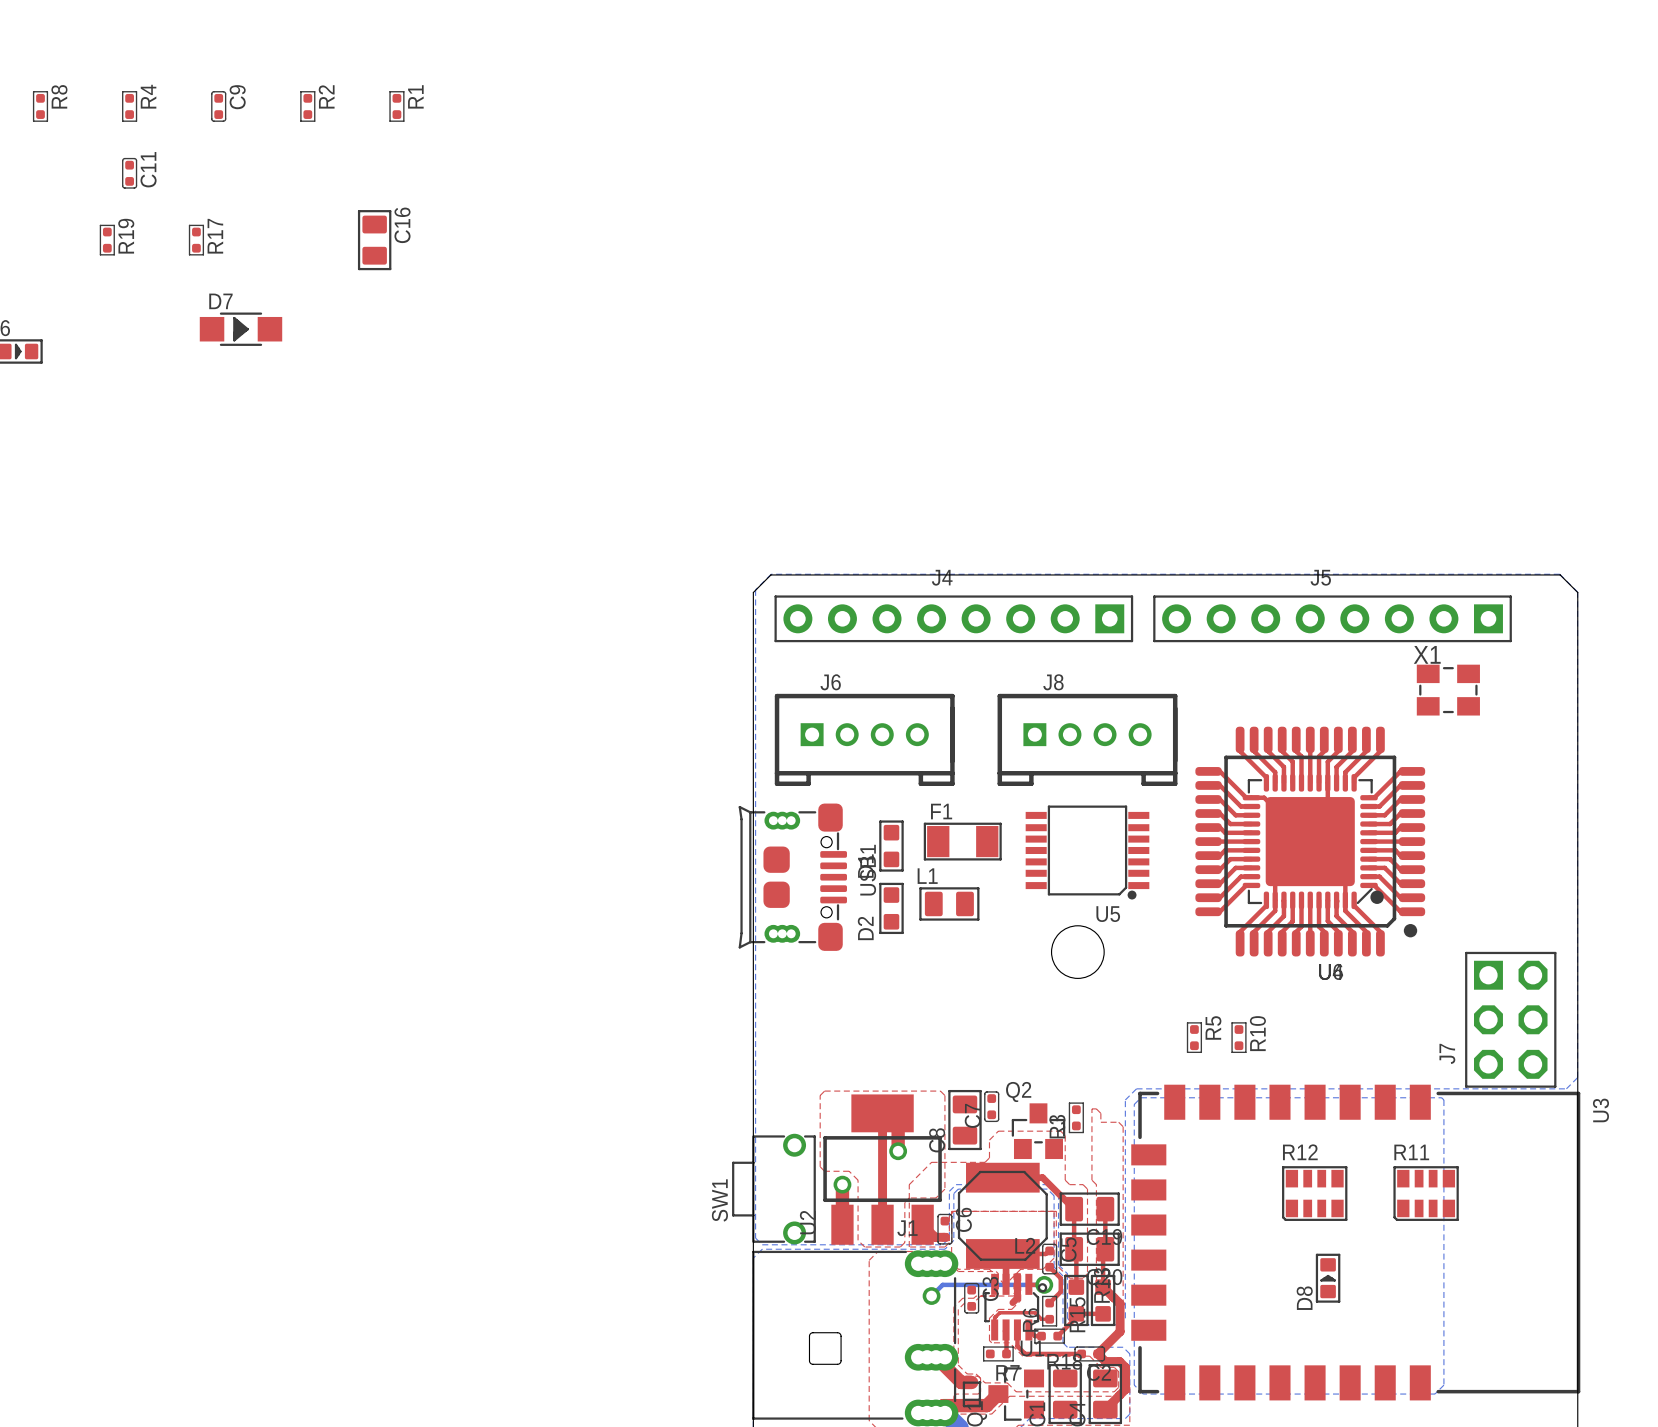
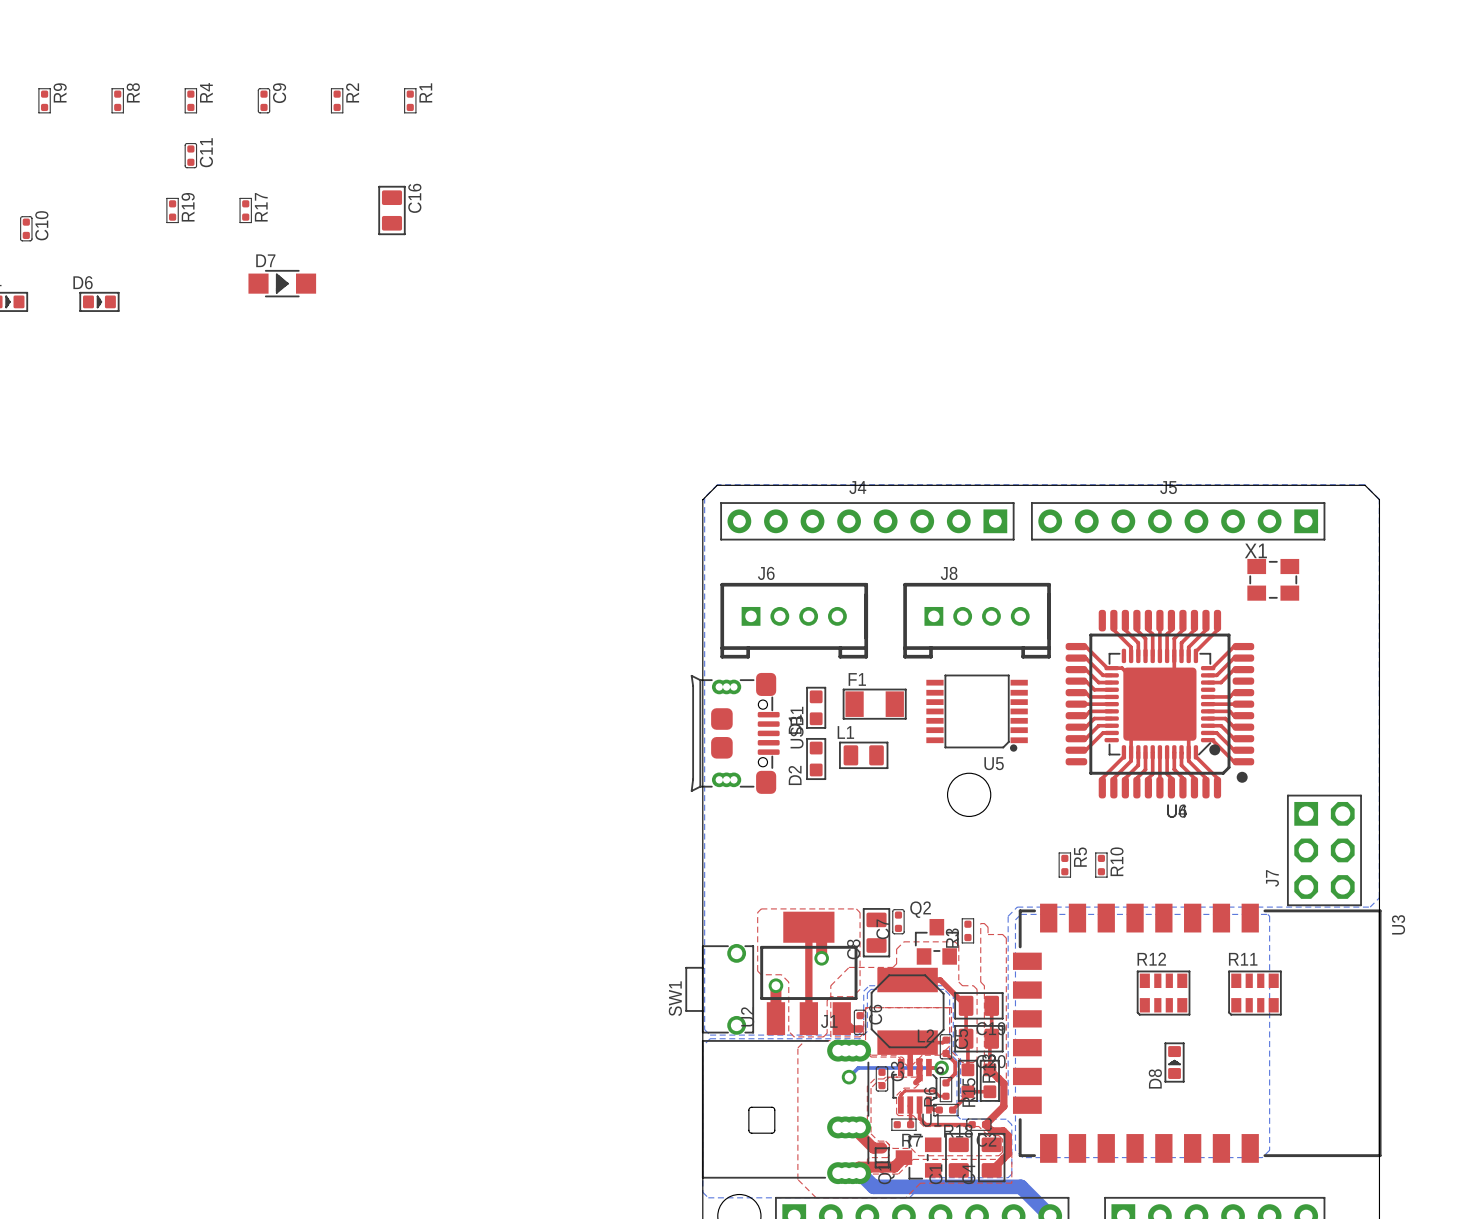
top track: (1240, 739) (1240, 751) (1266, 777) (1266, 782) -> none
top track: (1412, 813) (1400, 813) (1390, 824) (1369, 824) -> none
top track: (1251, 885) (1246, 885) (1219, 911) (1208, 911) -> none

